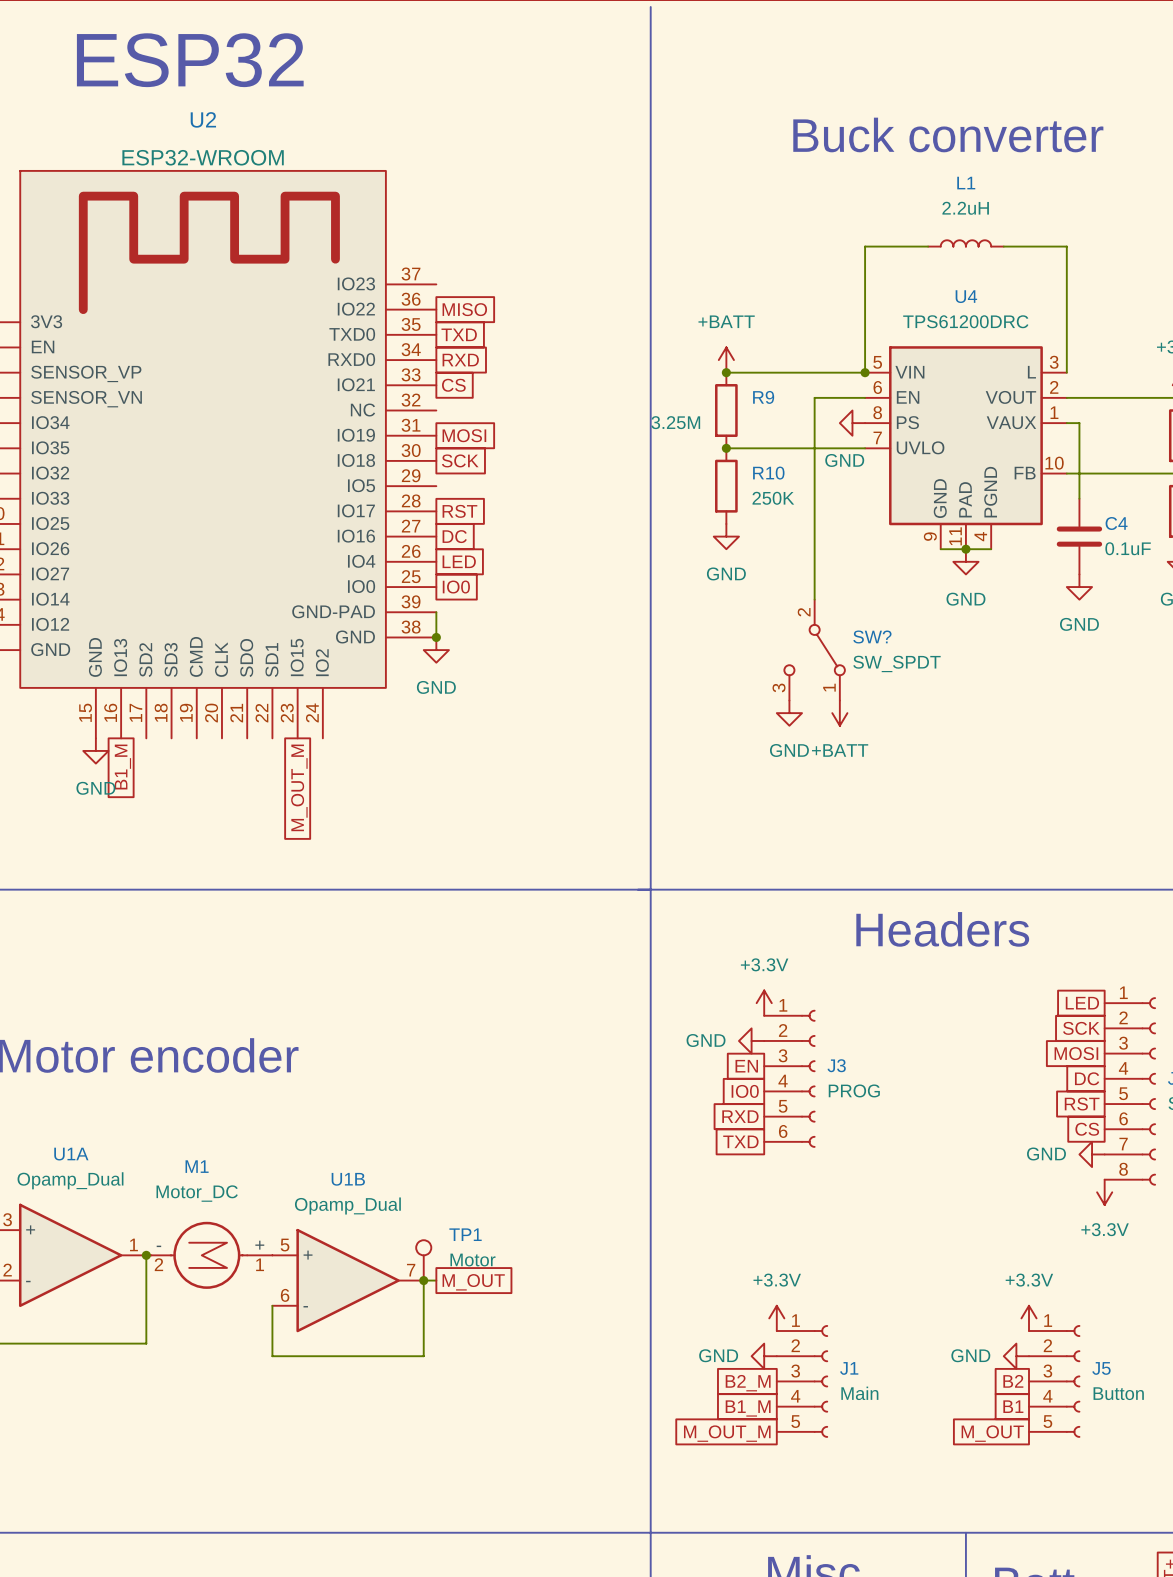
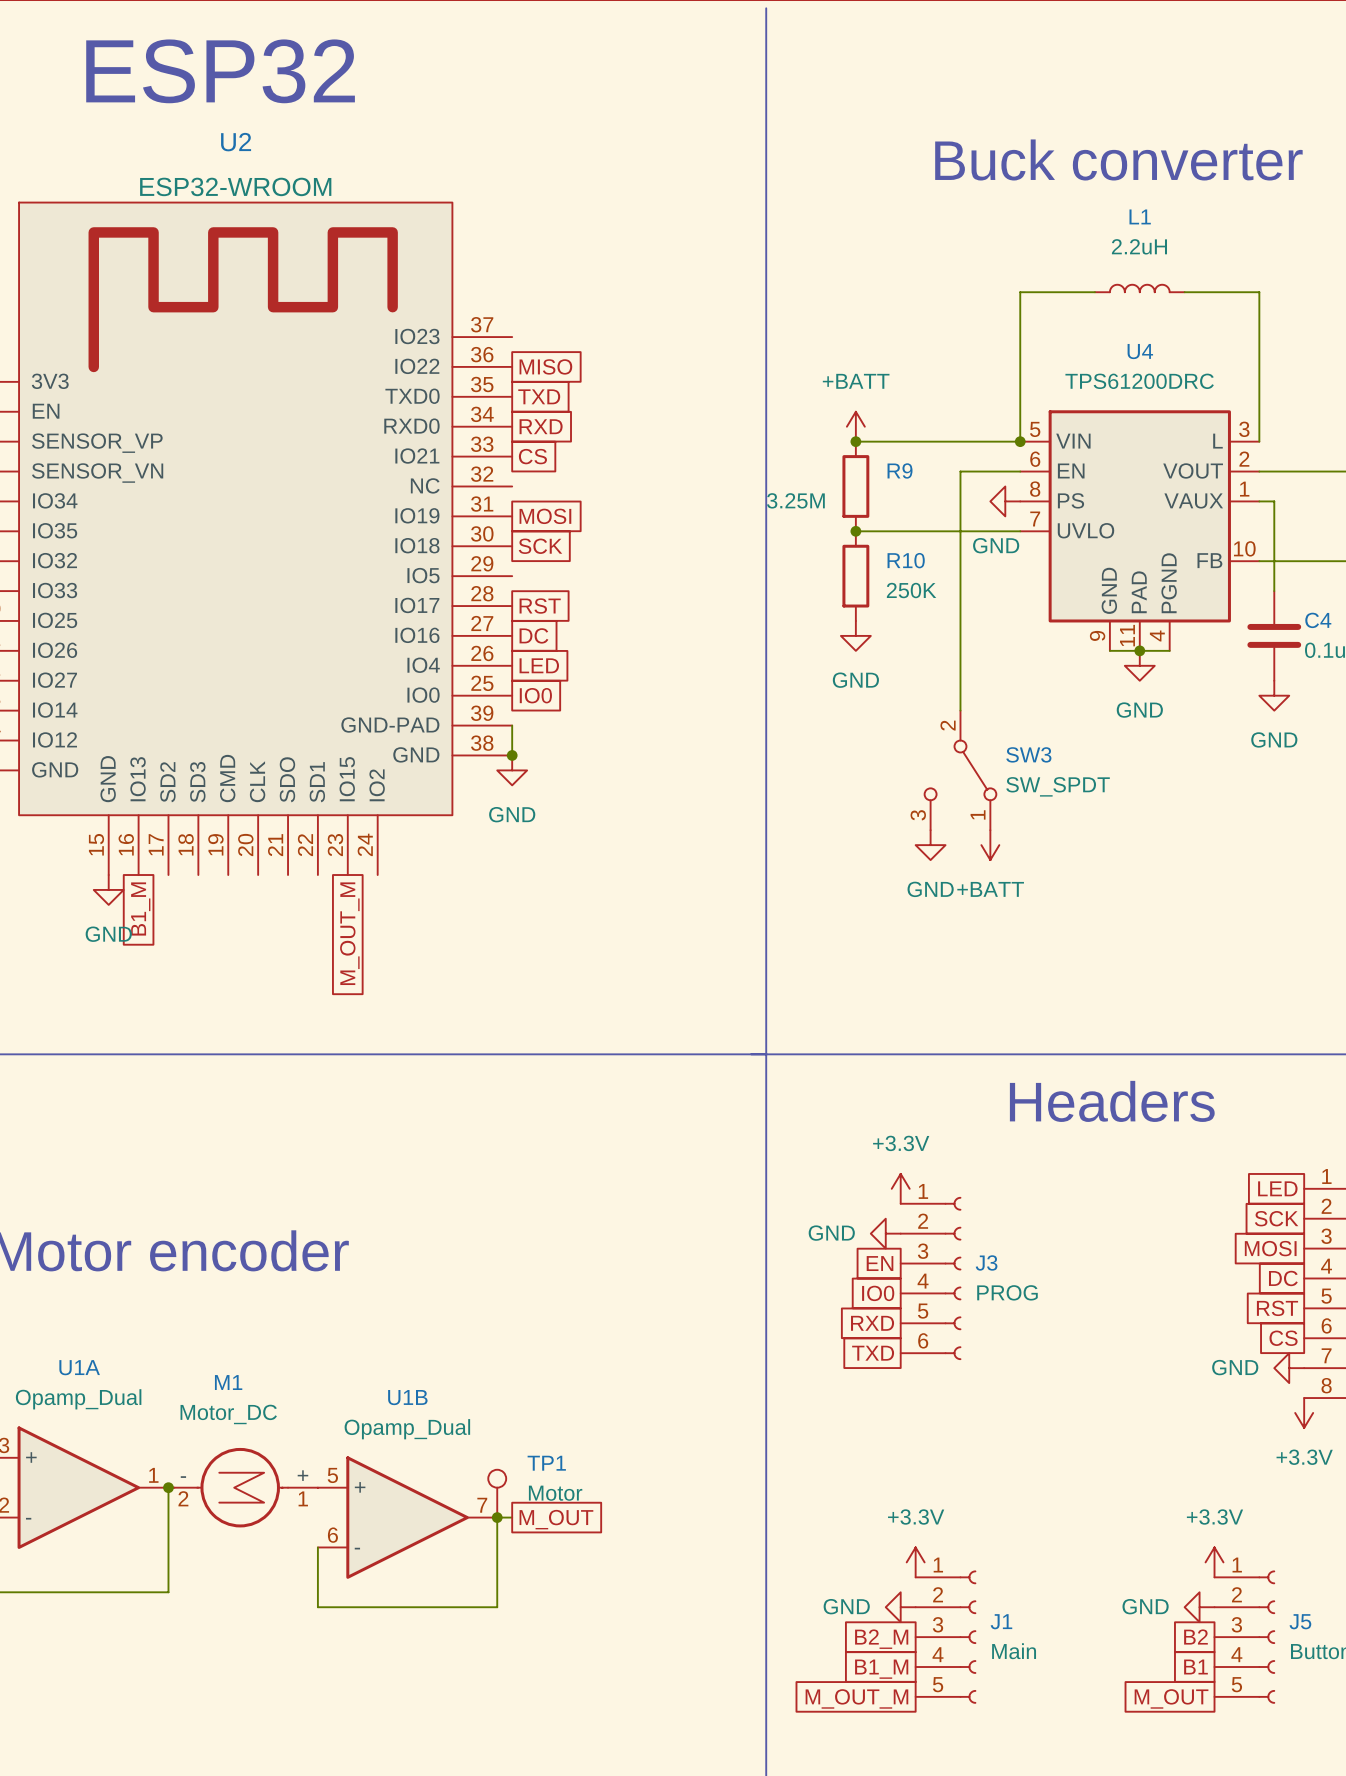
SW? name: SW? (872, 636) -> SW3 (1028, 754)

